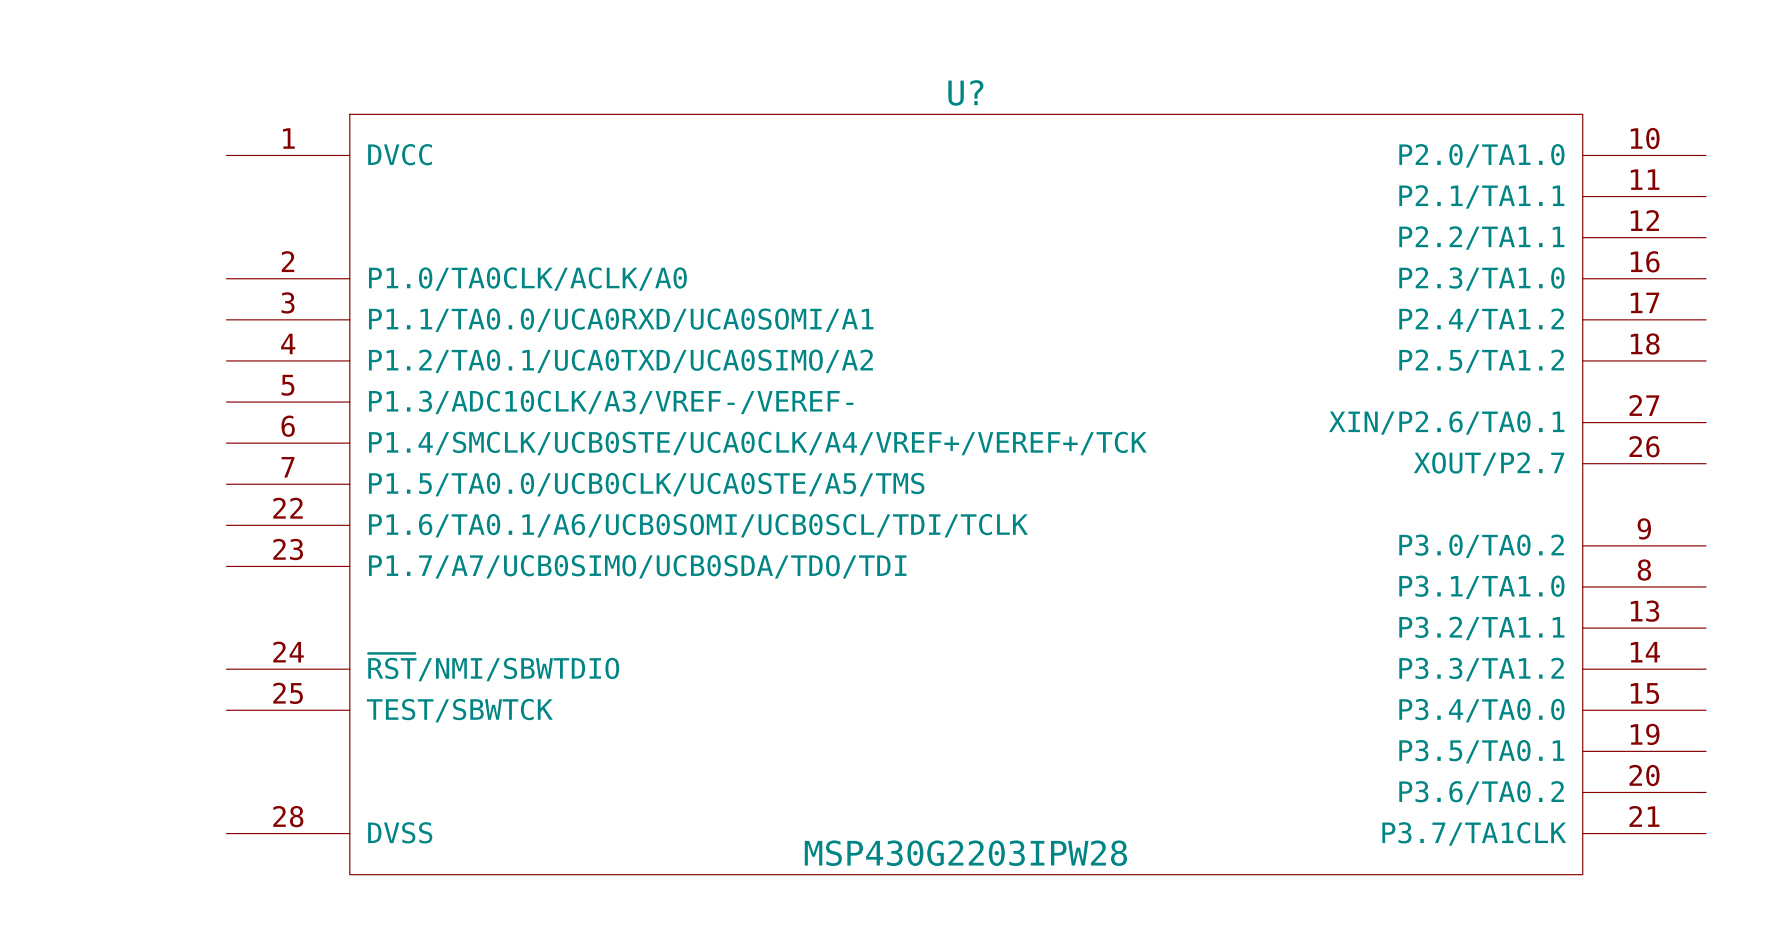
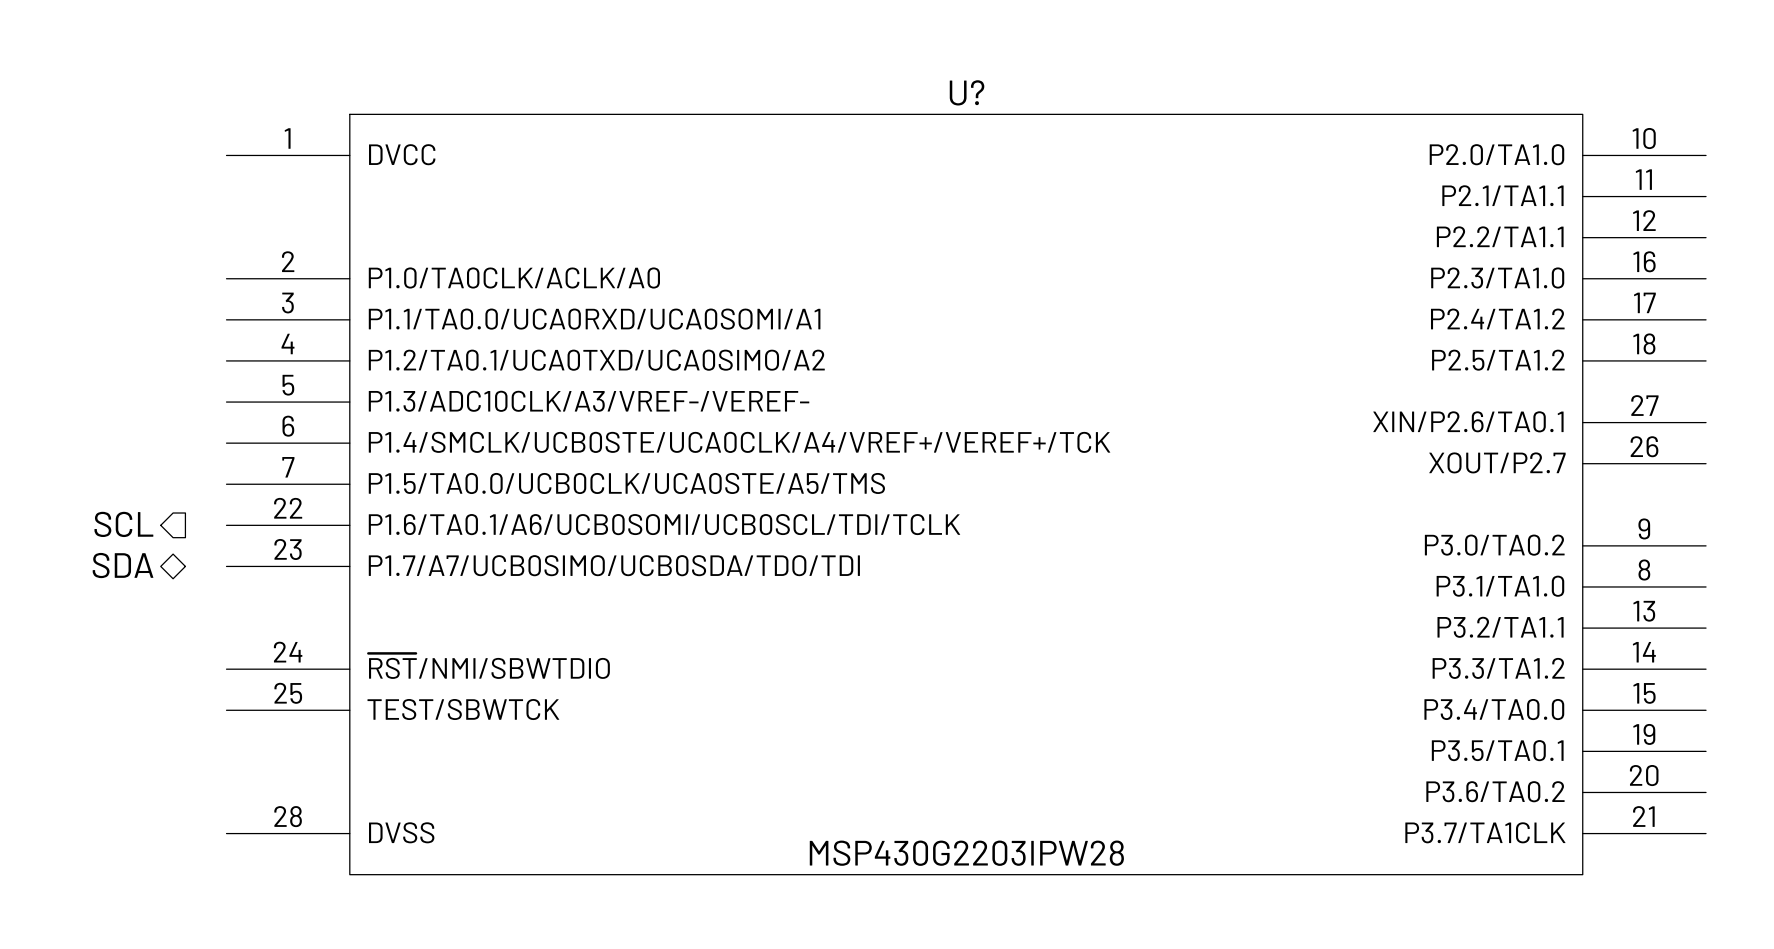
hierarchical label: none -> SCL (123, 524)
hierarchical label: none -> SDA (123, 565)

